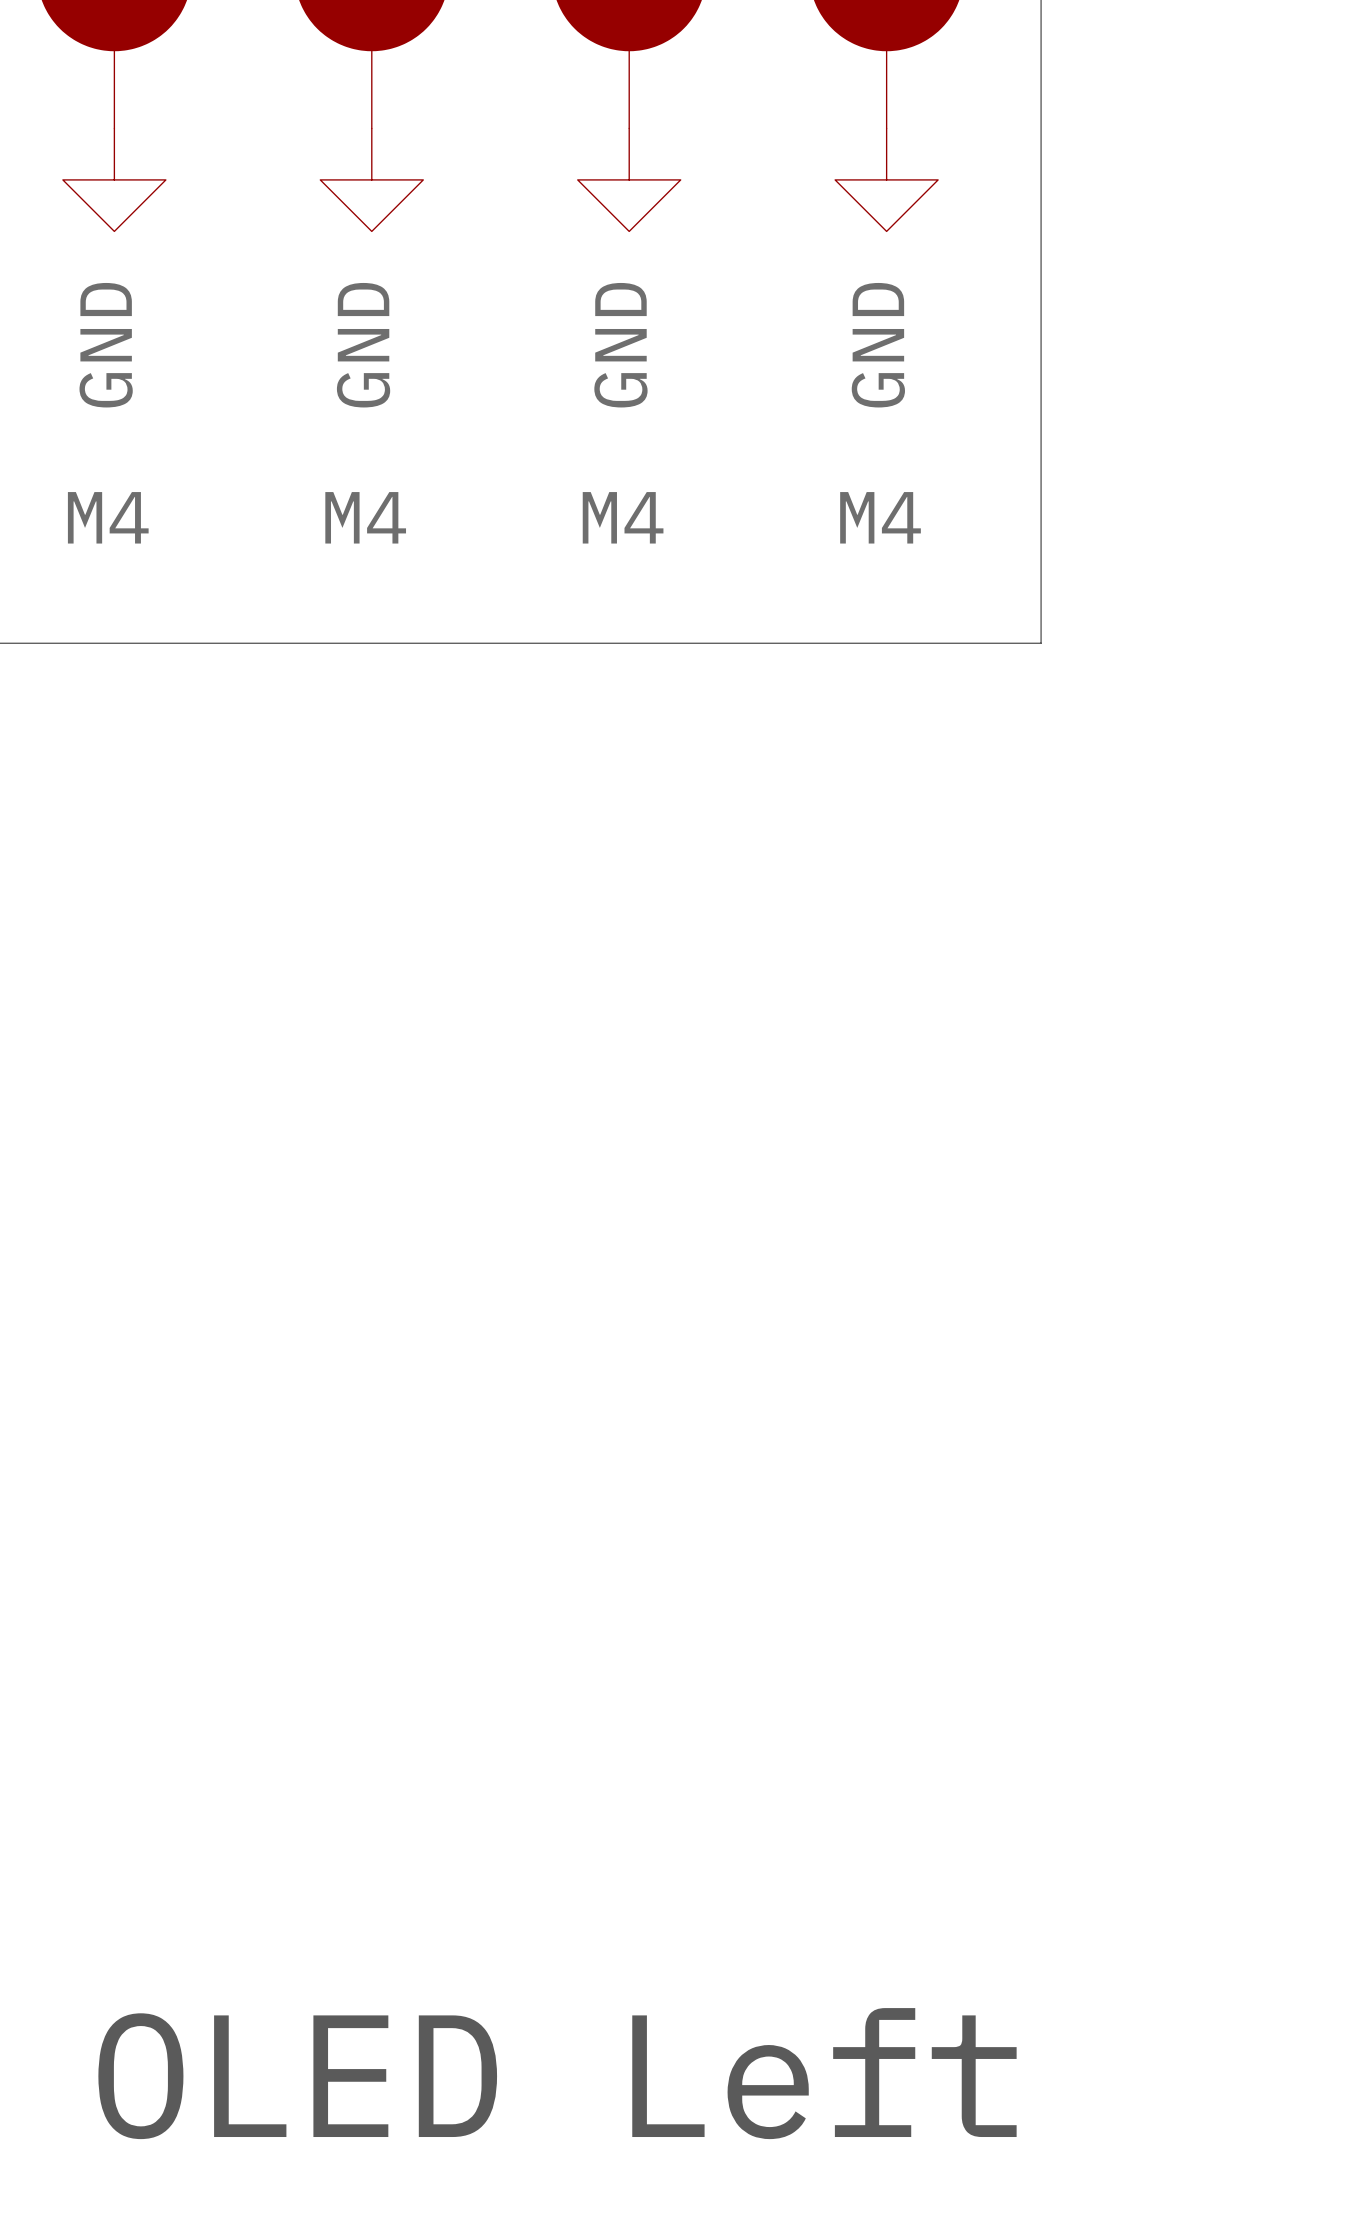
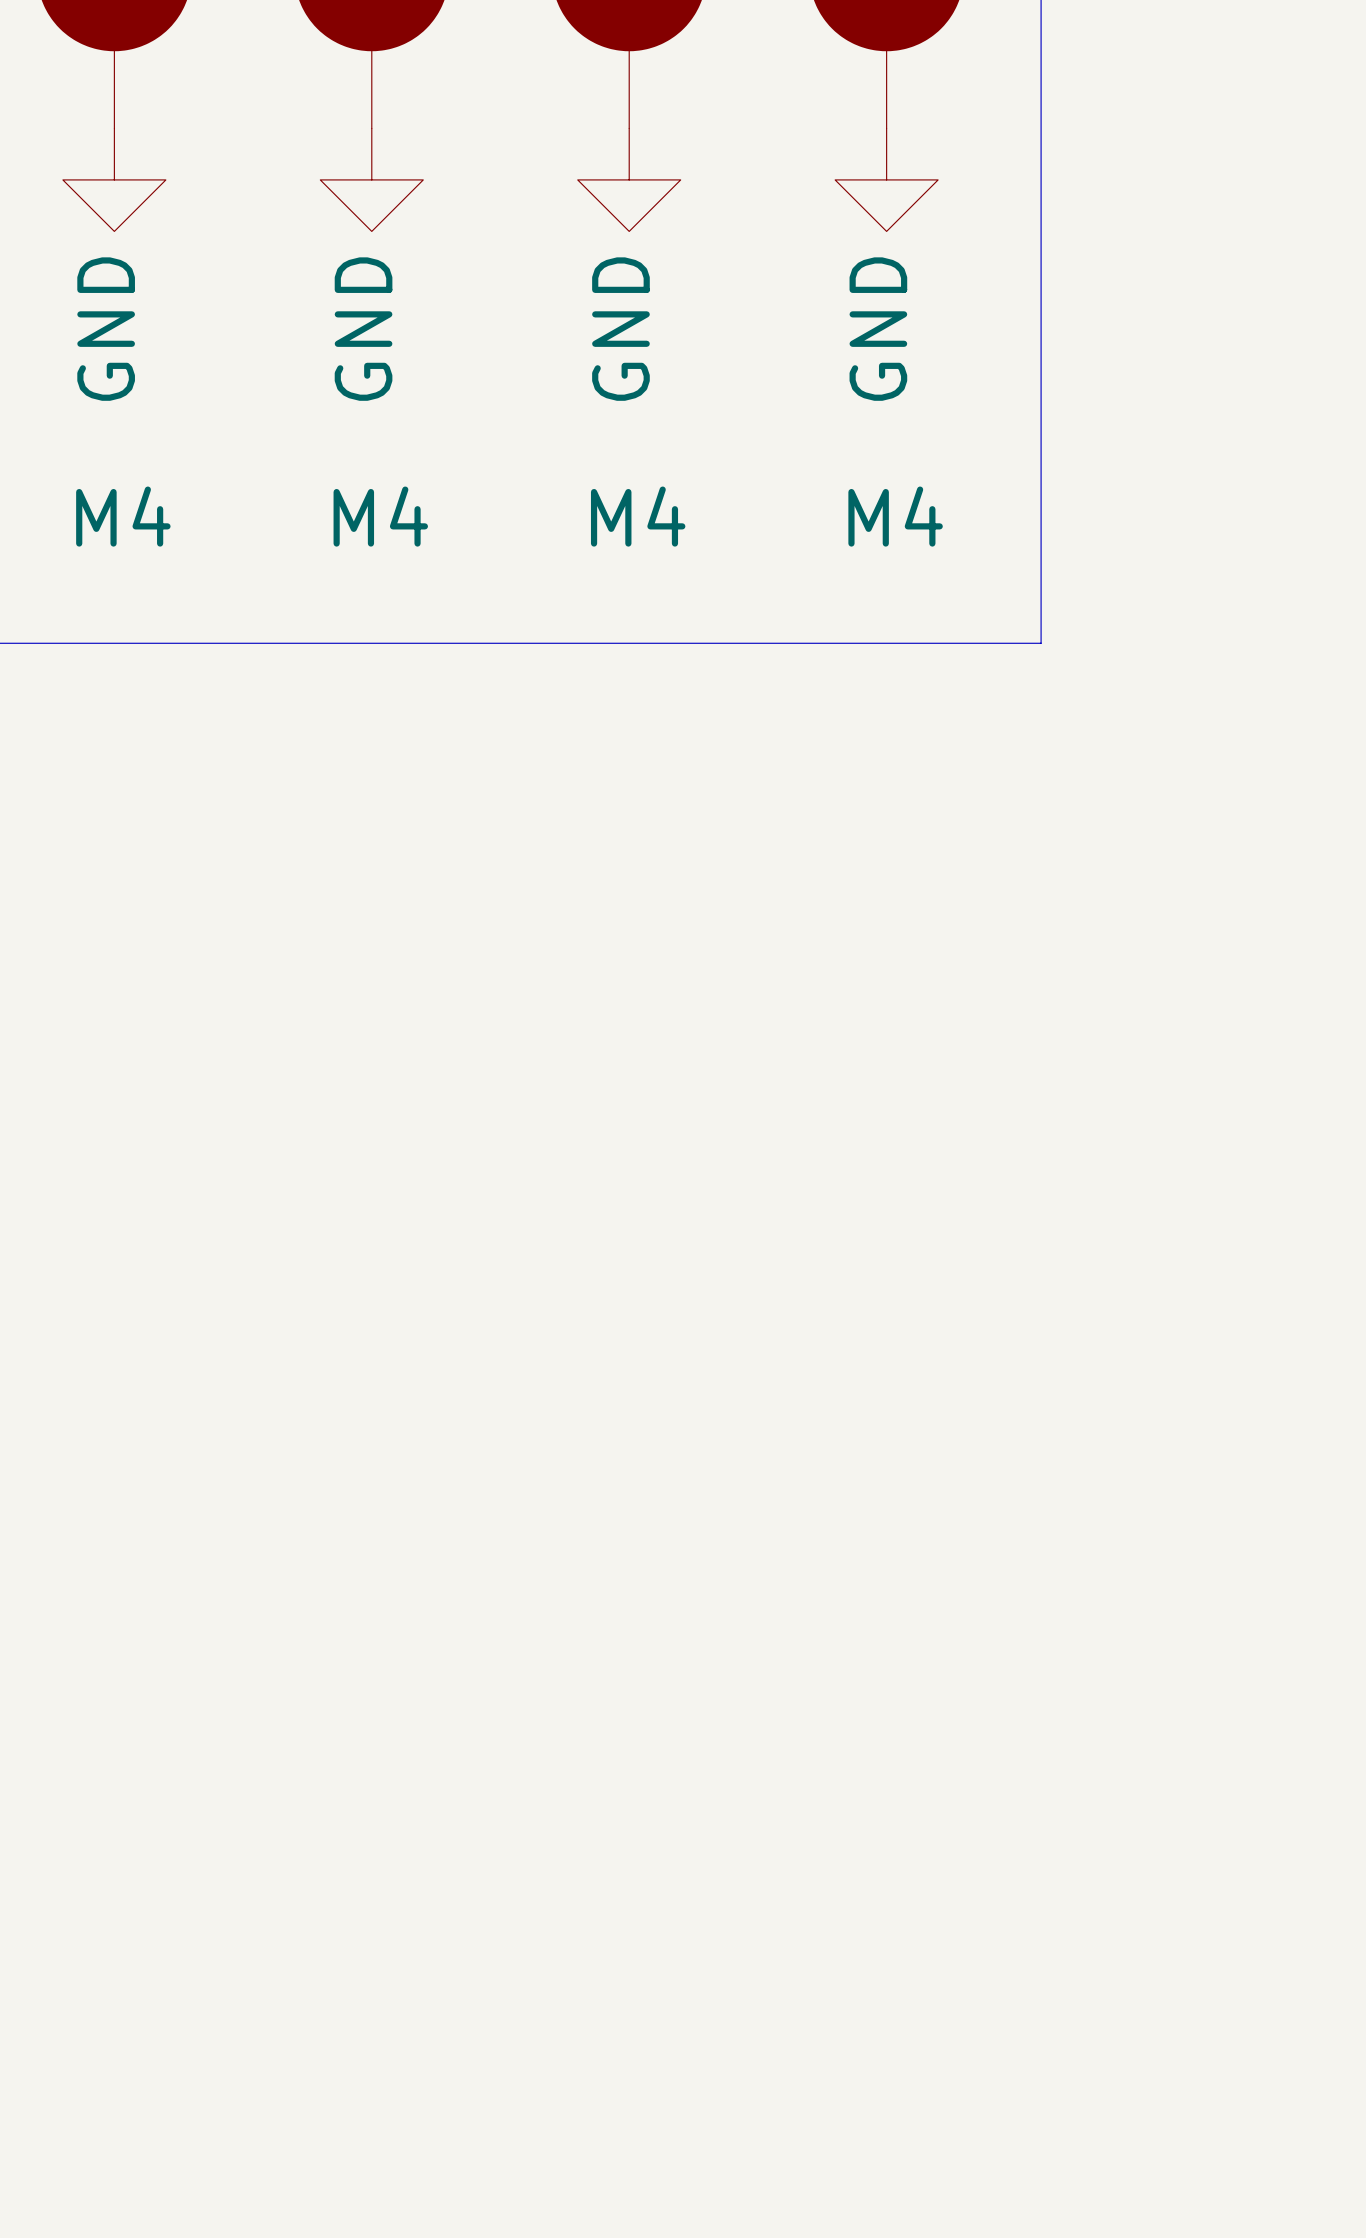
text: OLED Left (557, 2073) -> none

